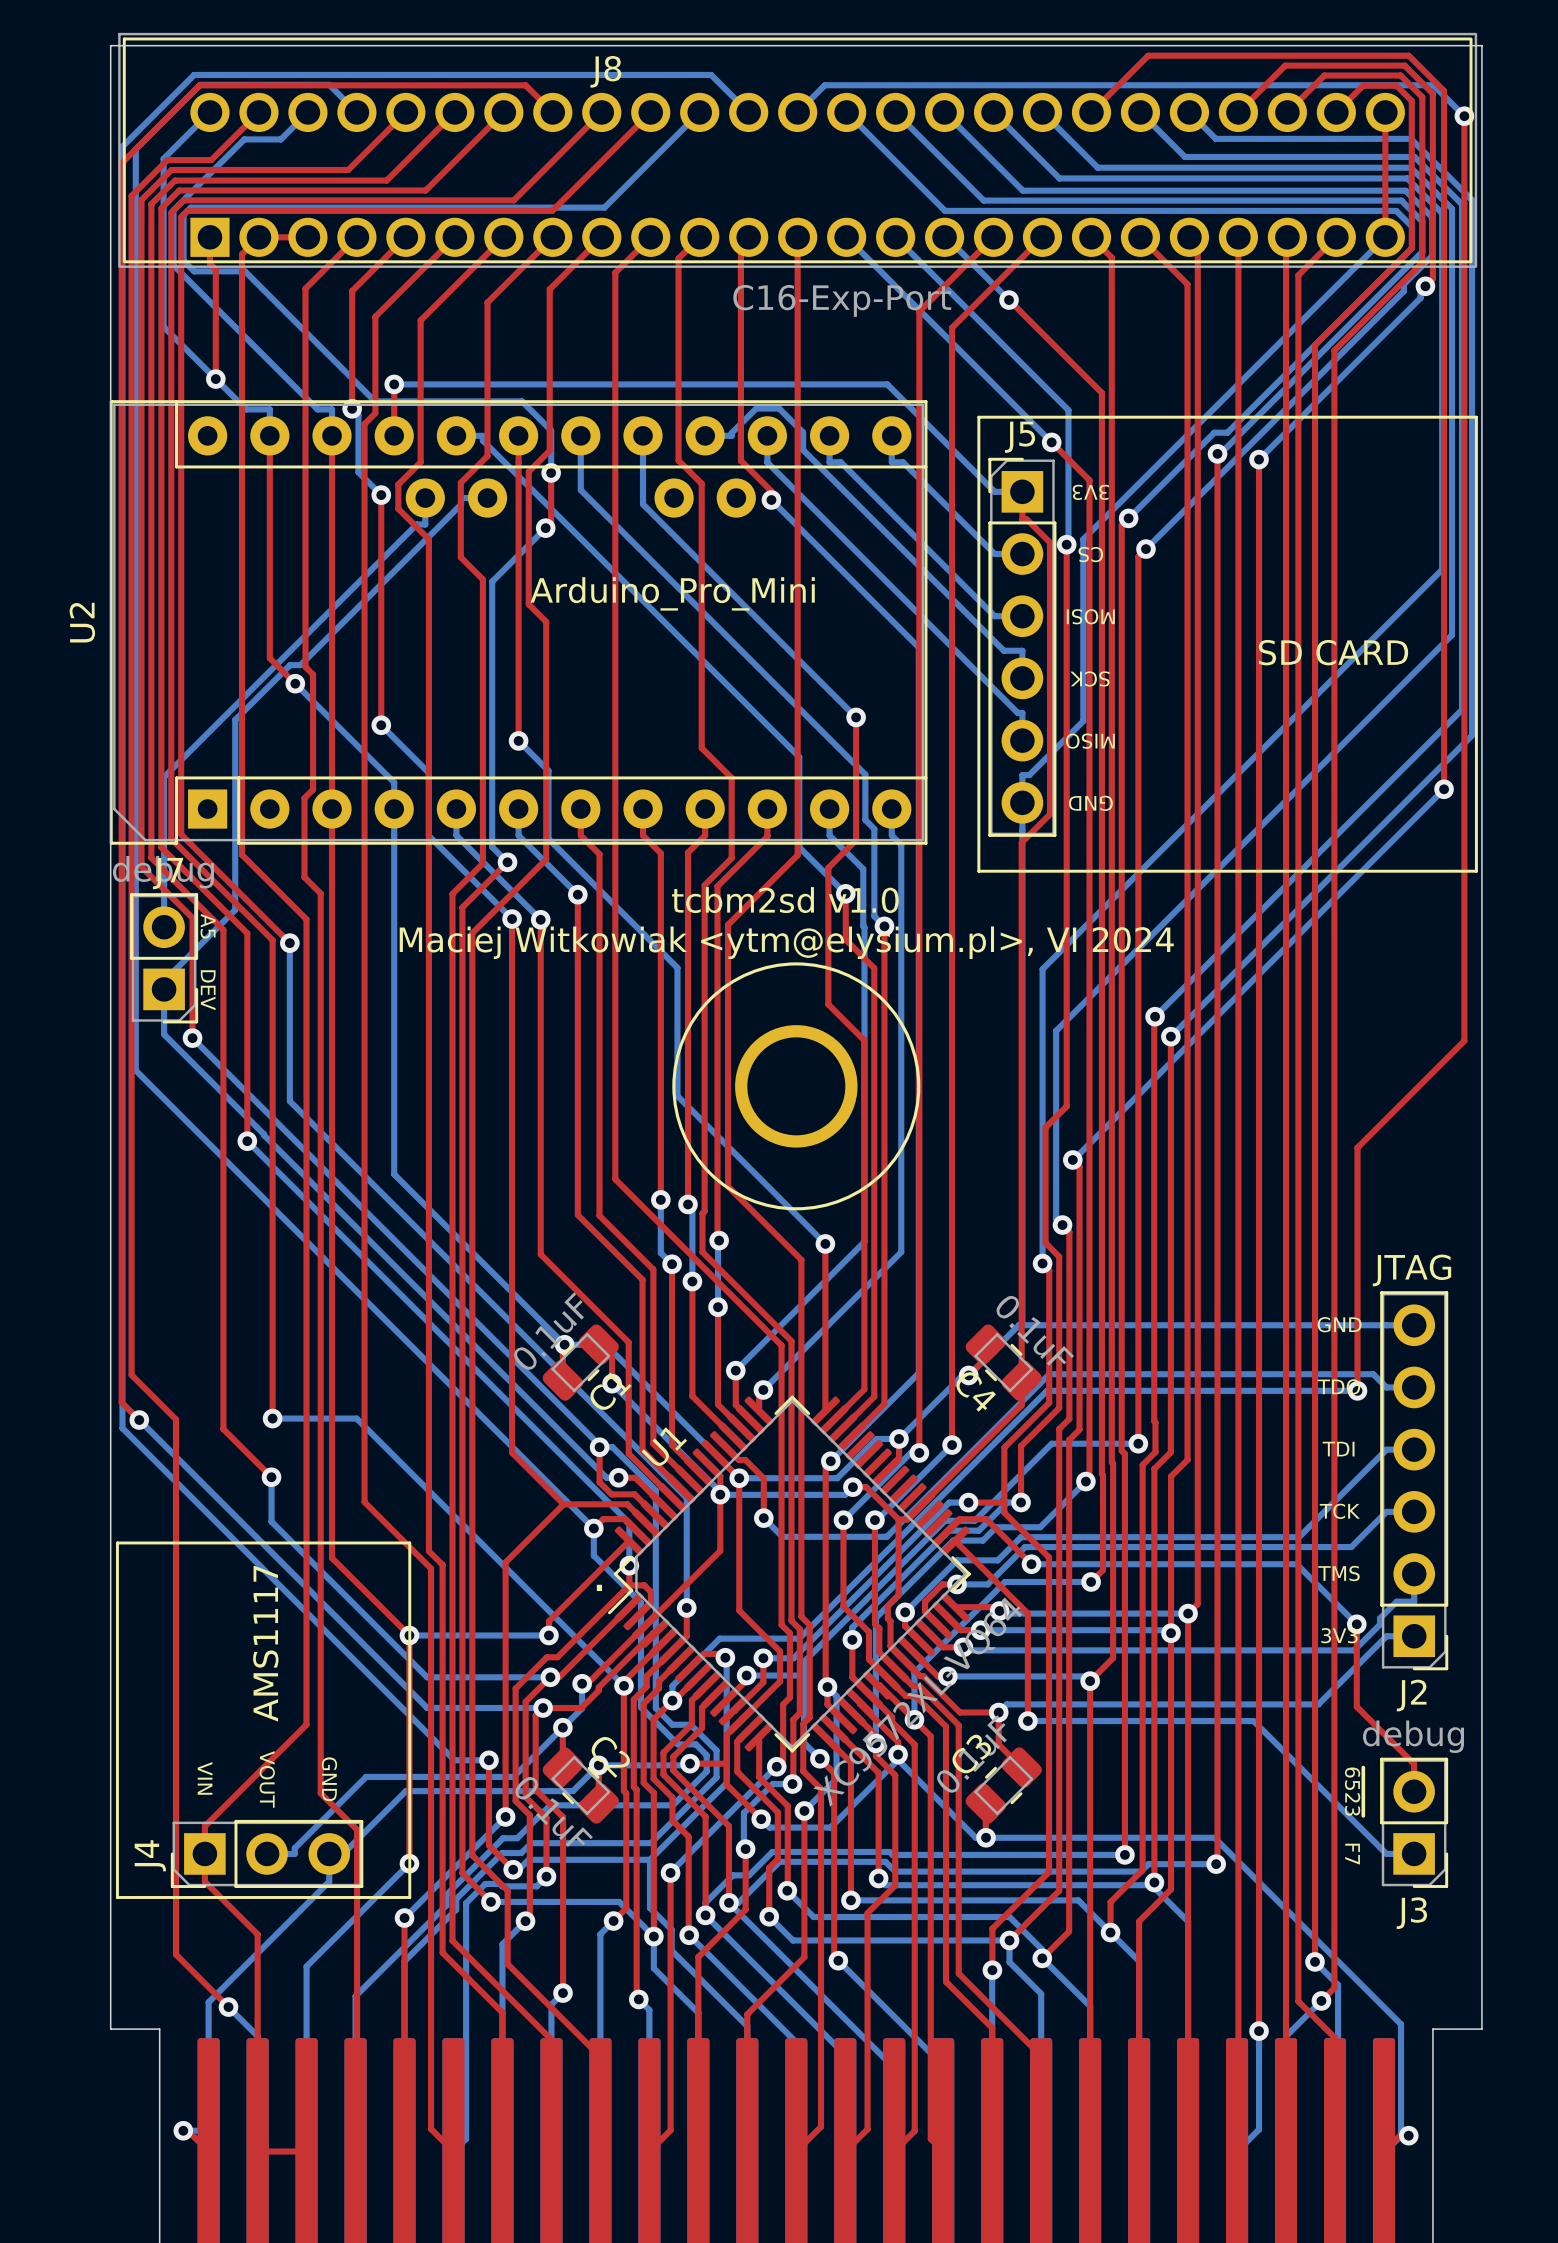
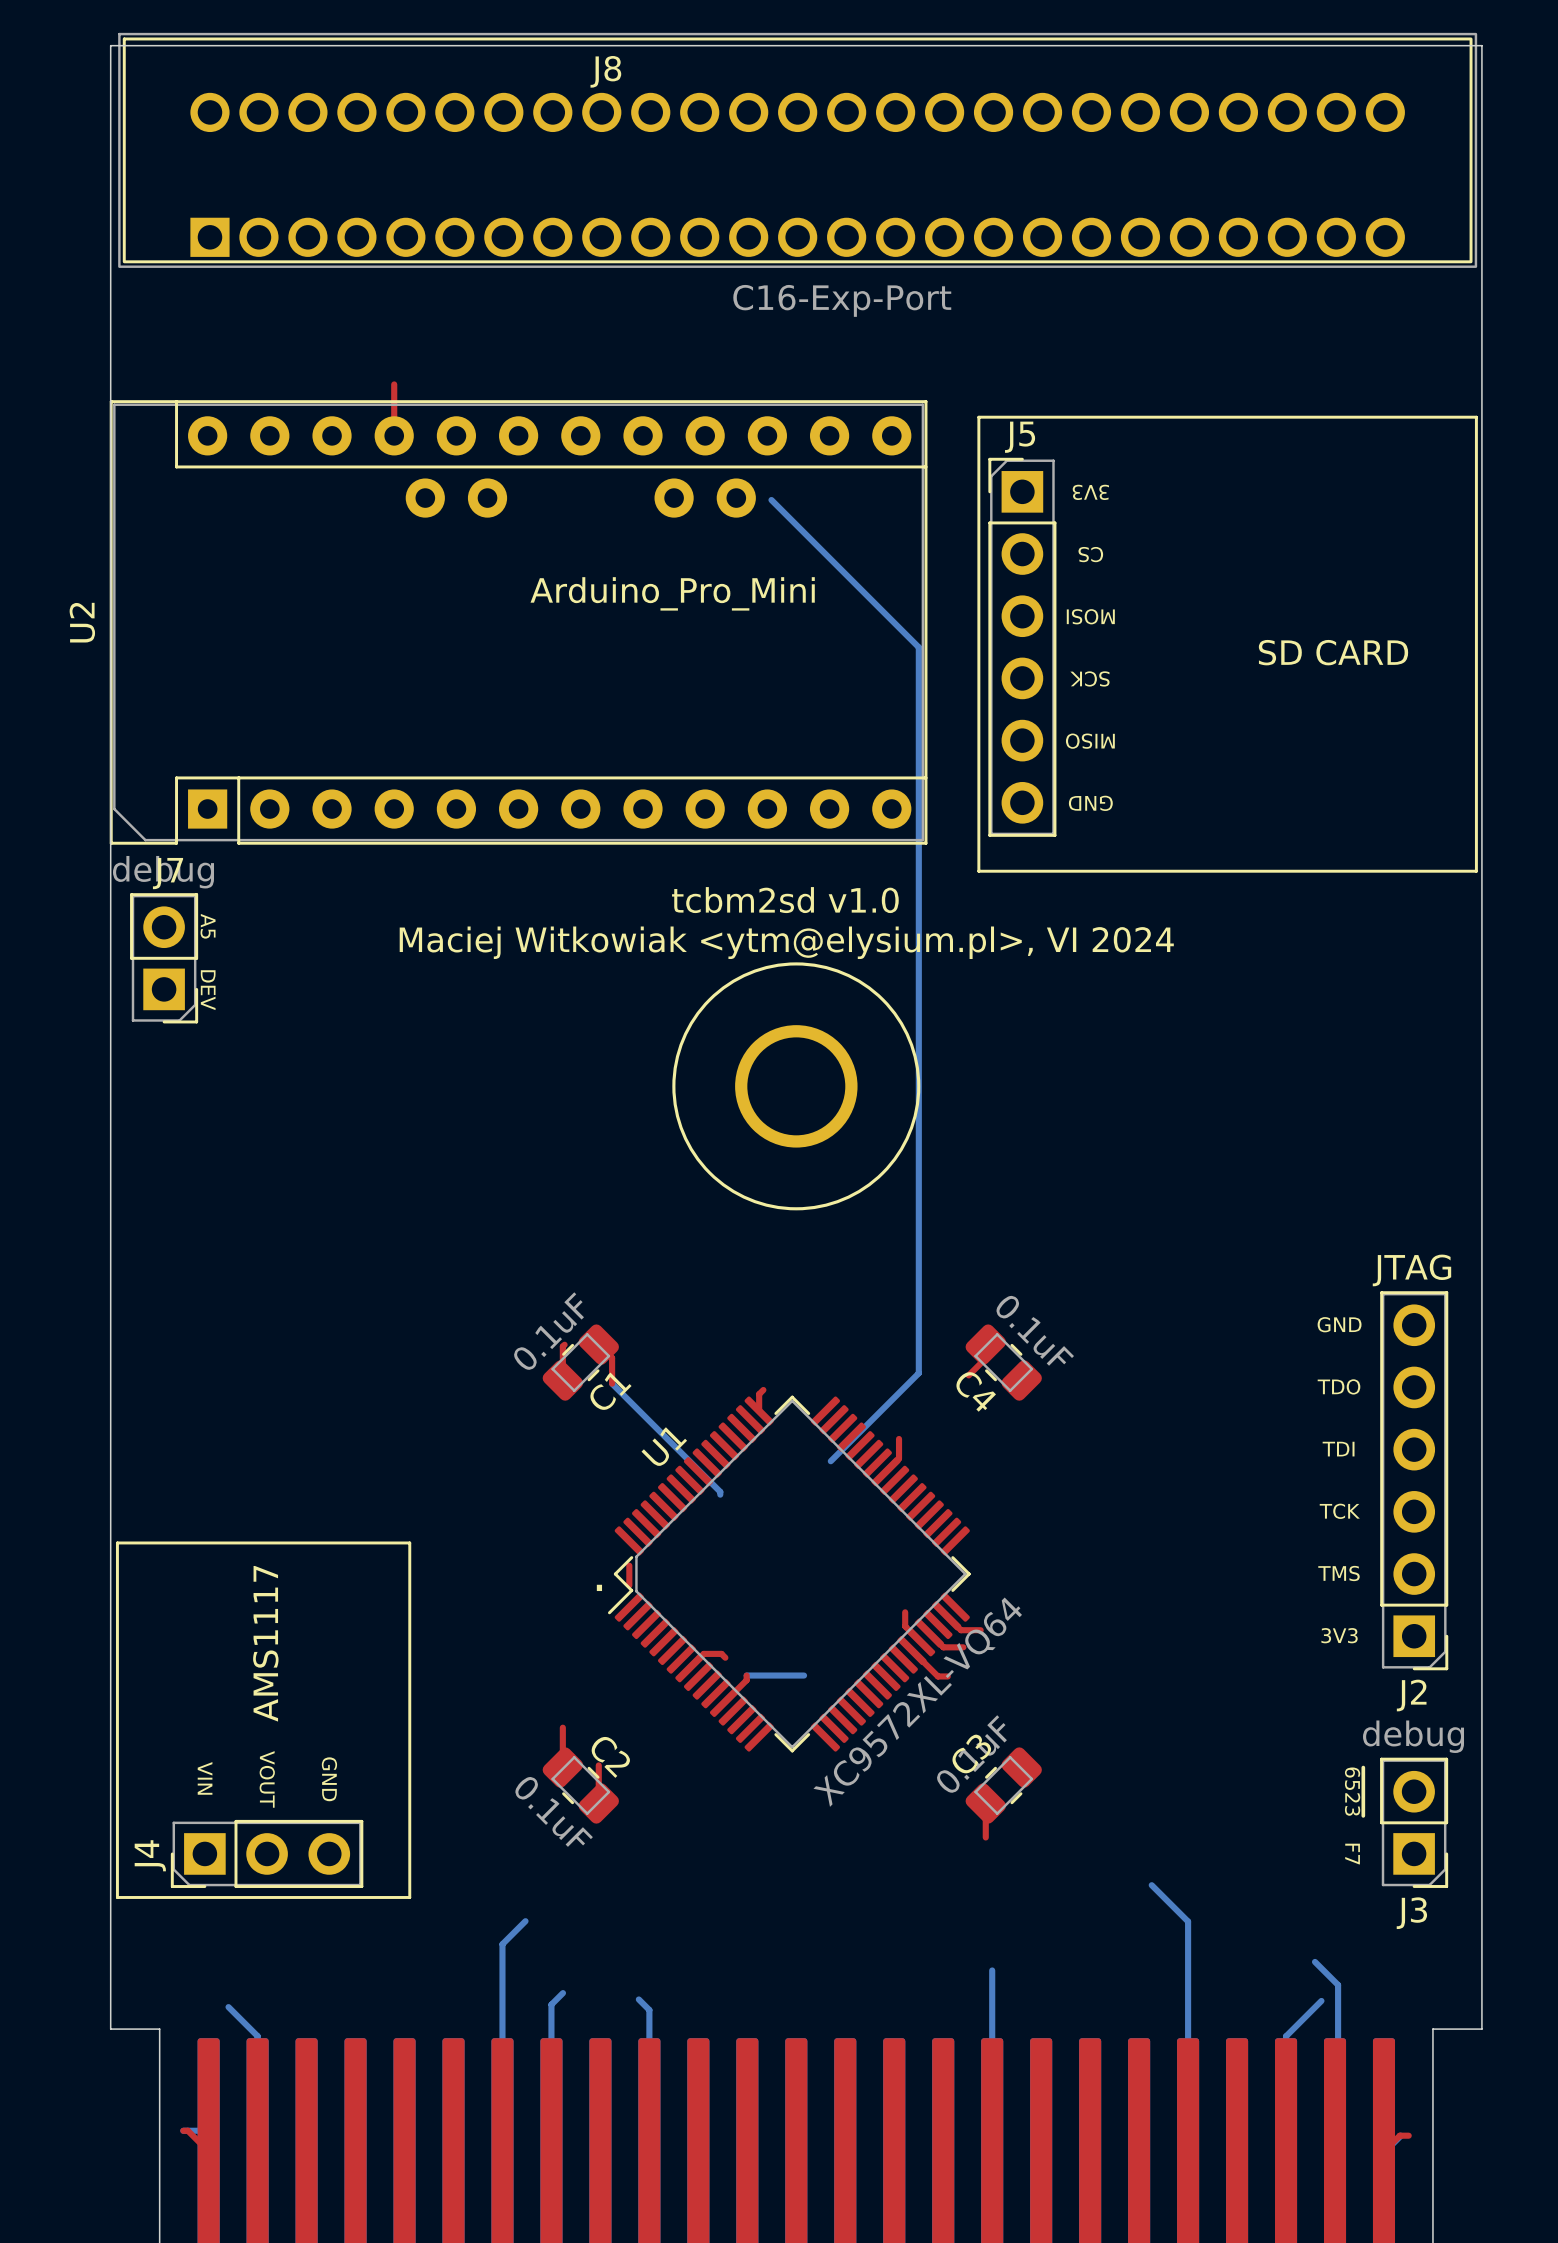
bottom track: (209, 112) (163, 158) (163, 326) (246, 409) (269, 409) (269, 435) -> none
top track: (258, 112) (211, 160) (167, 160) (131, 195) (131, 1375) (176, 1419) (176, 1954) (228, 2007) -> none
bottom track: (307, 112) (280, 139) (244, 139) (173, 210) (173, 265) (317, 409) (332, 409) (332, 435) -> none
bottom track: (356, 112) (329, 84) (200, 84) (135, 149) (135, 1070) (593, 1528) (593, 1555) (641, 1602) (641, 1707) (677, 1744) (695, 1744) (706, 1755) (706, 1771) (672, 1805) (550, 1805) (517, 1838) (503, 1838) (446, 1894) (446, 1905) (355, 1996) (355, 2151) -> none
top track: (405, 112) (348, 169) (171, 169) (141, 200) (141, 866) (192, 917) (192, 1038) -> none
top track: (454, 112) (386, 180) (174, 180) (151, 204) (151, 857) (223, 929) (223, 1429) (271, 1477) -> none
top track: (503, 112) (425, 190) (179, 190) (161, 208) (161, 847) (247, 933) (247, 1141) -> none
top track: (552, 112) (525, 85) (199, 85) (121, 163) (121, 1402) (139, 1420) -> none
top track: (601, 112) (513, 200) (183, 200) (171, 212) (171, 838) (272, 940) (272, 1418) -> none
top track: (650, 112) (552, 210) (187, 210) (181, 217) (181, 834) (289, 943) -> none
bottom track: (699, 112) (604, 207) (190, 207) (183, 214) (183, 260) (194, 271) (244, 271) (374, 401) (522, 401) (551, 430) (551, 472) -> none
bottom track: (748, 112) (711, 74) (194, 74) (122, 146) (122, 1428) (454, 1760) (488, 1760) -> none
bottom track: (797, 112) (824, 85) (1433, 85) (1464, 116) -> none
bottom track: (846, 112) (945, 210) (1396, 210) (1412, 226) (1412, 248) (1227, 432) (1214, 432) (1128, 518) -> none
bottom track: (895, 112) (983, 200) (1401, 200) (1422, 221) (1422, 251) (1220, 453) (1217, 453) -> none
bottom track: (944, 112) (1022, 190) (1405, 190) (1432, 217) (1432, 255) (1403, 284) (1403, 291) (1145, 549) -> none
bottom track: (993, 112) (1059, 178) (1407, 178) (1442, 213) (1442, 569) (1042, 969) (1042, 1263) -> none
bottom track: (1042, 112) (1097, 167) (1410, 167) (1452, 208) (1452, 635) (1056, 1030) (1056, 1218) (1062, 1225) -> none
top track: (1091, 112) (1148, 55) (1408, 55) (1444, 90) (1444, 789) -> none
bottom track: (1140, 112) (1185, 156) (1414, 156) (1462, 204) (1462, 709) (1155, 1016) -> none
bottom track: (1189, 112) (1215, 138) (1410, 138) (1472, 199) (1472, 735) (1170, 1036) -> none
top track: (1238, 112) (1285, 65) (1404, 65) (1432, 93) (1432, 278) (1425, 286) -> none
top track: (1287, 112) (1324, 75) (1400, 75) (1422, 97) (1422, 262) (1334, 350) (1334, 1987) (1321, 2000) -> none
top track: (1336, 112) (1363, 85) (1396, 85) (1411, 100) (1411, 248) (1315, 345) (1315, 1961) -> none
top track: (1385, 112) (1385, 237) -> none
top track: (1464, 116) (1464, 1040) (1357, 1147) (1357, 1390) -> none
via: (1464, 116) -> none
top track: (209, 237) (209, 263) (215, 269) (215, 379) -> none
top track: (307, 237) (258, 237) (242, 254) (242, 854) (306, 919) (306, 1724) (204, 1826) (204, 1881) (257, 1934) (257, 2151) (306, 2151) -> none
top track: (356, 237) (305, 288) (305, 666) (313, 674) (313, 789) (304, 798) (304, 877) (320, 893) (320, 1793) (357, 1829) (357, 2149) (355, 2151) -> none
top track: (405, 237) (352, 291) (352, 408) -> none
top track: (454, 237) (375, 316) (375, 413) (364, 424) (364, 1502) (431, 1568) (431, 2129) (453, 2151) -> none
top track: (503, 237) (420, 320) (420, 462) (398, 484) (398, 508) (428, 539) (428, 1551) (442, 1564) (442, 1952) (502, 2012) (502, 2151) -> none
top track: (552, 237) (487, 302) (487, 456) (460, 482) (460, 557) (482, 579) (482, 863) (452, 893) (452, 1940) (551, 2039) (551, 2151) -> none
top track: (601, 237) (549, 289) (549, 450) (528, 471) (528, 604) (546, 621) (546, 859) (472, 933) (472, 1855) (507, 1890) (507, 1964) (600, 2056) (600, 2151) -> none
top track: (650, 237) (615, 272) (615, 1179) (781, 1345) (781, 1624) (789, 1633) (789, 1697) (783, 1704) (783, 1760) (776, 1766) -> none
top track: (699, 237) (678, 258) (678, 460) (701, 483) (701, 748) (731, 778) (731, 858) (704, 885) (704, 1211) (702, 1213) (702, 1252) (791, 1341) (791, 1620) (799, 1629) (799, 1713) (793, 1719) (792, 1784) -> none
top track: (748, 237) (740, 245) (740, 460) (771, 491) (771, 500) -> none
top track: (797, 237) (797, 855) (728, 924) (728, 1186) (801, 1259) (801, 1616) (809, 1625) (809, 1717) (803, 1723) (803, 1771) (821, 1789) (821, 2126) (796, 2151) -> none
bottom track: (846, 237) (1051, 442) -> none
bottom track: (895, 237) (1068, 410) (1068, 542) (1066, 544) -> none
bottom track: (944, 237) (1009, 300) -> none
top track: (993, 237) (919, 311) (919, 1452) -> none
top track: (1042, 237) (952, 327) (952, 1445) -> none
top track: (1091, 237) (1111, 257) (1113, 1658) (1090, 1681) (1090, 2151) -> none
top track: (1140, 237) (1187, 284) (1187, 1459) (1171, 1476) (1171, 1889) (1139, 1921) (1139, 2151) -> none
top track: (1189, 237) (1197, 245) (1197, 1603) (1188, 1613) (1188, 2151) -> none
top track: (1238, 237) (1237, 2151) -> none
top track: (1287, 237) (1286, 2151) -> none
top track: (1336, 237) (1298, 275) (1298, 2001) (1335, 2038) (1335, 2151) -> none
bottom track: (1385, 237) (1083, 539) (1083, 721) (1029, 775) (1022, 775) (1022, 1325) -> none
bottom track: (1425, 286) (1420, 291) (1420, 298) (1259, 459) -> none
via: (1425, 286) -> none
top track: (1009, 300) (1101, 392) (1103, 1570) (1091, 1582) -> none
via: (1009, 300) -> none
via: (215, 379) -> none
bottom track: (394, 384) (887, 384) (994, 491) (1022, 491) -> none
via: (394, 384) -> none
bottom track: (352, 408) (358, 415) (358, 472) (381, 495) -> none
via: (352, 408) -> none
top track: (269, 435) (269, 658) (295, 683) -> none
top track: (332, 435) (332, 1558) (409, 1635) (409, 1863) -> none
bottom track: (456, 435) (482, 435) (482, 440) (799, 757) (799, 847) (845, 893) -> none
top track: (518, 435) (518, 740) -> none
bottom track: (580, 435) (580, 490) (865, 774) (865, 819) (874, 828) (874, 916) (884, 926) -> none
bottom track: (643, 435) (643, 504) (856, 717) -> none
bottom track: (705, 435) (731, 435) (731, 433) (756, 408) (779, 408) (803, 432) (803, 449) (1003, 650) (1022, 650) (1022, 678) -> none
bottom track: (767, 435) (767, 462) (1017, 712) (1022, 712) (1022, 740) -> none
bottom track: (829, 435) (829, 462) (840, 462) (994, 616) (1022, 616) -> none
bottom track: (891, 435) (891, 462) (903, 462) (994, 554) (1022, 554) -> none
top track: (1051, 442) (1089, 480) (1089, 1477) (1085, 1481) -> none
via: (1051, 442) -> none
top track: (1217, 453) (1216, 1864) -> none
via: (1217, 453) -> none
top track: (1259, 459) (1259, 2031) -> none
via: (1259, 459) -> none
top track: (551, 472) (551, 522) (545, 528) -> none
via: (551, 472) -> none
top track: (1022, 491) (1022, 519) (1026, 519) (1050, 542) (1050, 814) (1021, 842) (1021, 1405) (907, 1519) (898, 1519) -> none
top track: (381, 495) (381, 725) -> none
via: (381, 495) -> none
bottom track: (425, 498) (425, 524) (416, 524) (164, 777) (164, 939) -> none
bottom track: (487, 498) (461, 498) (461, 504) (300, 665) (290, 665) (235, 719) (235, 909) (171, 974) (164, 974) (164, 1034) (606, 1477) (618, 1477) -> none
via: (771, 500) -> none
top track: (1128, 518) (1121, 525) (1121, 1450) (1124, 1453) (1124, 1854) -> none
via: (1128, 518) -> none
bottom track: (545, 528) (492, 581) (492, 846) (507, 862) -> none
via: (545, 528) -> none
top track: (1066, 544) (1066, 1106) (1045, 1127) (1045, 1243) (1059, 1256) (1059, 1407) (1021, 1446) (1021, 1502) -> none
via: (1066, 544) -> none
top track: (1145, 549) (1138, 556) (1138, 1443) -> none
via: (1145, 549) -> none
bottom track: (295, 683) (394, 782) (394, 1174) (564, 1344) (605, 1344) (739, 1478) (837, 1478) (876, 1438) (899, 1438) (962, 1375) (968, 1375) (1018, 1325) (1414, 1325) -> none
via: (295, 683) -> none
top track: (856, 717) (856, 840) (828, 867) (828, 1004) (864, 1040) (864, 1389) (834, 1419) -> none
via: (856, 717) -> none
bottom track: (381, 725) (428, 772) (428, 835) (512, 919) -> none
via: (381, 725) -> none
bottom track: (518, 740) (548, 770) (548, 838) (677, 967) (677, 1096) (825, 1243) -> none
via: (518, 740) -> none
bottom track: (1444, 789) (1072, 1159) -> none
via: (1444, 789) -> none
bottom track: (456, 809) (456, 835) (540, 919) -> none
bottom track: (518, 809) (518, 835) (577, 894) -> none
top track: (580, 809) (580, 835) (599, 854) (599, 1215) (653, 1269) (653, 1443) (689, 1480) -> none
top track: (643, 809) (643, 835) (660, 853) (660, 1199) -> none
top track: (705, 809) (705, 835) (688, 852) (688, 1204) -> none
top track: (767, 809) (767, 836) (717, 886) (717, 1238) (719, 1240) -> none
bottom track: (829, 809) (829, 835) (863, 869) (864, 1241) (735, 1370) -> none
bottom track: (891, 809) (891, 835) (901, 844) (901, 1252) (763, 1389) -> none
top track: (507, 862) (462, 907) (462, 1873) (490, 1901) -> none
via: (507, 862) -> none
top track: (845, 893) (845, 939) (874, 968) (874, 1396) (842, 1428) -> none
via: (845, 893) -> none
top track: (577, 894) (577, 1215) (642, 1279) (642, 1450) (681, 1488) -> none
via: (577, 894) -> none
top track: (512, 919) (512, 1452) (563, 1504) -> none
via: (512, 919) -> none
top track: (540, 919) (540, 1254) (628, 1342) (628, 1453) (672, 1497) -> none
via: (540, 919) -> none
top track: (884, 926) (884, 1403) (851, 1437) -> none
via: (884, 926) -> none
bottom track: (289, 943) (289, 1101) (686, 1498) (686, 1607) -> none
via: (289, 943) -> none
top track: (1155, 1016) (1155, 1452) (1142, 1464) (1142, 1870) (1110, 1902) (1110, 1932) -> none
via: (1155, 1016) -> none
top track: (1170, 1036) (1170, 1452) (1154, 1468) (1154, 1882) -> none
via: (1170, 1036) -> none
bottom track: (192, 1038) (599, 1447) (612, 1447) (655, 1490) (655, 1708) (672, 1724) (690, 1724) (716, 1750) (716, 1777) (650, 1843) (531, 1843) (521, 1853) (502, 1853) (456, 1899) (456, 1909) (404, 1961) (404, 2151) -> none
via: (192, 1038) -> none
bottom track: (247, 1141) (629, 1523) (629, 1565) -> none
via: (247, 1141) -> none
top track: (1072, 1159) (1079, 1166) (1079, 1429) (1069, 1440) (1069, 1931) (1042, 1958) -> none
via: (1072, 1159) -> none
bottom track: (660, 1199) (660, 1252) (672, 1264) -> none
via: (660, 1199) -> none
bottom track: (688, 1204) (692, 1208) (692, 1281) -> none
via: (688, 1204) -> none
top track: (1062, 1225) (1069, 1231) (1069, 1418) (1059, 1429) (1059, 1890) (1009, 1940) -> none
via: (1062, 1225) -> none
bottom track: (719, 1240) (718, 1307) -> none
via: (719, 1240) -> none
top track: (825, 1243) (825, 1411) -> none
via: (825, 1243) -> none
top track: (1042, 1263) (1049, 1270) (1049, 1402) (1004, 1447) (1004, 1512) (1049, 1557) (1049, 1872) (992, 1928) (992, 1970) -> none
via: (1042, 1263) -> none
top track: (672, 1264) (672, 1445) (698, 1471) -> none
via: (672, 1264) -> none
top track: (692, 1281) (692, 1396) (733, 1437) -> none
via: (692, 1281) -> none
top track: (718, 1307) (718, 1404) (741, 1428) -> none
via: (718, 1307) -> none
via: (564, 1344) -> none
top track: (735, 1370) (735, 1404) (750, 1419) -> none
via: (735, 1370) -> none
via: (968, 1375) -> none
via: (612, 1383) -> none
bottom track: (1414, 1387) (1386, 1387) (1373, 1374) (1049, 1374) (886, 1536) (782, 1536) (763, 1518) -> none
via: (763, 1389) -> none
bottom track: (1357, 1390) (1046, 1390) (799, 1638) (719, 1638) (672, 1685) (672, 1700) -> none
via: (1357, 1390) -> none
bottom track: (272, 1418) (356, 1418) (624, 1685) -> none
via: (272, 1418) -> none
bottom track: (139, 1420) (427, 1708) (543, 1708) -> none
via: (139, 1420) -> none
via: (899, 1438) -> none
bottom track: (1138, 1443) (1051, 1443) (974, 1520) (945, 1520) (804, 1661) (804, 1742) (819, 1758) -> none
via: (1138, 1443) -> none
top track: (724, 1445) (738, 1460) (745, 1460) (763, 1478) (763, 1518) -> none
bottom track: (952, 1445) (874, 1520) -> none
via: (952, 1445) -> none
top track: (599, 1447) (599, 1482) (611, 1494) (634, 1494) (655, 1514) -> none
via: (599, 1447) -> none
bottom track: (1414, 1449) (1386, 1449) (1299, 1537) (1021, 1537) (997, 1560) (957, 1560) (905, 1612) -> none
bottom track: (919, 1452) (910, 1452) (843, 1520) -> none
via: (919, 1452) -> none
top track: (715, 1454) (739, 1478) (739, 1610) (780, 1651) (780, 1681) (726, 1734) (726, 1784) (761, 1819) -> none
top track: (830, 1461) (825, 1466) (825, 1685) (827, 1687) (827, 1704) (842, 1719) -> none
via: (830, 1461) -> none
top track: (707, 1463) (720, 1476) (720, 1550) (587, 1683) (582, 1683) -> none
bottom track: (271, 1477) (271, 1521) (427, 1677) (550, 1677) -> none
via: (271, 1477) -> none
top track: (618, 1477) (635, 1477) (663, 1506) -> none
via: (618, 1477) -> none
via: (739, 1478) -> none
bottom track: (1085, 1481) (1040, 1527) (996, 1527) (982, 1540) (953, 1540) (875, 1617) (875, 1743) -> none
via: (1085, 1481) -> none
top track: (852, 1487) (866, 1487) (898, 1519) -> none
bottom track: (852, 1487) (845, 1494) (720, 1494) -> none
via: (852, 1487) -> none
via: (720, 1494) -> none
top track: (968, 1502) (1004, 1502) -> none
bottom track: (968, 1502) (949, 1502) (793, 1658) (763, 1658) -> none
via: (968, 1502) -> none
bottom track: (1021, 1502) (1006, 1502) (978, 1530) (949, 1530) (852, 1627) (852, 1639) -> none
via: (1021, 1502) -> none
top track: (563, 1504) (505, 1562) (505, 1816) -> none
top track: (563, 1504) (627, 1504) (646, 1523) -> none
bottom track: (1414, 1511) (1386, 1511) (1351, 1547) (1025, 1547) (987, 1584) (957, 1584) -> none
via: (763, 1518) -> none
top track: (898, 1519) (898, 1595) (887, 1605) (887, 1618) (890, 1621) (890, 1646) (959, 1712) (998, 1712) (998, 1744) (1021, 1767) -> none
top track: (843, 1520) (843, 1606) (869, 1632) (869, 1659) (905, 1695) (915, 1695) (946, 1726) (946, 1981) (992, 2027) (992, 2151) -> none
via: (843, 1520) -> none
top track: (874, 1520) (874, 1623) (879, 1628) (879, 1652) (912, 1685) (919, 1685) (958, 1725) (958, 1973) (1041, 2055) (1041, 2151) -> none
via: (874, 1520) -> none
top track: (593, 1528) (603, 1519) (624, 1519) (637, 1532) -> none
via: (593, 1528) -> none
top track: (946, 1532) (959, 1519) (986, 1519) (1031, 1564) -> none
top track: (629, 1540) (548, 1621) (548, 1635) -> none
top track: (955, 1540) (1027, 1613) (1027, 1721) -> none
bottom track: (1031, 1564) (1296, 1564) (1356, 1624) -> none
via: (1031, 1564) -> none
via: (629, 1565) -> none
bottom track: (1414, 1574) (1414, 1601) (1396, 1601) (1380, 1618) (1380, 1624) (1354, 1650) (966, 1650) (963, 1647) -> none
bottom track: (1091, 1582) (1005, 1582) (914, 1672) (914, 1719) -> none
via: (1091, 1582) -> none
top track: (957, 1584) (942, 1584) (925, 1601) (925, 1611) (937, 1624) -> none
via: (957, 1584) -> none
top track: (629, 1607) (559, 1677) (550, 1677) (525, 1701) (525, 1796) (546, 1817) (546, 1876) -> none
top track: (686, 1607) (686, 1636) (646, 1676) (646, 1686) (633, 1699) (633, 1786) (636, 1789) (636, 1997) (638, 1999) -> none
via: (686, 1607) -> none
top track: (955, 1607) (995, 1607) (999, 1610) -> none
bottom track: (999, 1610) (1002, 1613) (1188, 1613) -> none
via: (999, 1610) -> none
via: (905, 1612) -> none
via: (1188, 1613) -> none
top track: (637, 1615) (650, 1602) (650, 1591) (644, 1585) (629, 1585) (557, 1657) (546, 1657) (515, 1688) (515, 1800) (529, 1815) (529, 1916) (525, 1921) -> none
top track: (1356, 1624) (1356, 1706) (1414, 1764) (1414, 1791) -> none
via: (1356, 1624) -> none
bottom track: (980, 1630) (1168, 1630) (1171, 1633) -> none
via: (980, 1630) -> none
top track: (655, 1633) (598, 1687) (598, 1690) (581, 1708) (543, 1708) (535, 1715) (535, 1789) (563, 1817) (563, 1992) -> none
via: (1171, 1633) -> none
bottom track: (409, 1635) (548, 1635) -> none
via: (409, 1635) -> none
via: (548, 1635) -> none
bottom track: (1414, 1636) (1386, 1636) (1318, 1704) (1006, 1704) (998, 1712) -> none
top track: (852, 1639) (852, 1677) (891, 1716) (891, 1721) (914, 1744) (914, 2131) (894, 2151) -> none
via: (852, 1639) -> none
top track: (663, 1641) (624, 1681) (626, 1908) (613, 1921) -> none
via: (963, 1647) -> none
bottom track: (725, 1657) (726, 1783) (649, 1859) -> none
via: (725, 1657) -> none
top track: (763, 1658) (763, 1682) (733, 1711) -> none
via: (763, 1658) -> none
top track: (681, 1659) (659, 1681) (659, 1688) (643, 1703) (643, 1782) (653, 1793) (653, 1936) -> none
via: (746, 1675) -> none
top track: (698, 1676) (653, 1719) (653, 1778) (672, 1797) (672, 1820) (688, 1836) (689, 1935) -> none
bottom track: (947, 1676) (1085, 1676) (1090, 1681) -> none
via: (947, 1676) -> none
via: (550, 1677) -> none
via: (1090, 1681) -> none
bottom track: (582, 1683) (582, 1708) (513, 1776) (366, 1776) (294, 1848) (294, 1853) (267, 1853) -> none
via: (582, 1683) -> none
via: (624, 1685) -> none
top track: (707, 1685) (691, 1700) (691, 1724) (663, 1752) (663, 1774) (705, 1816) (705, 1915) -> none
top track: (877, 1685) (879, 1685) (930, 1736) (930, 2139) (943, 2151) -> none
bottom track: (827, 1687) (836, 1696) (836, 1778) (804, 1810) -> none
via: (827, 1687) -> none
top track: (715, 1693) (702, 1707) (702, 1728) (673, 1756) (673, 1770) (728, 1826) (728, 1902) -> none
via: (672, 1700) -> none
top track: (860, 1702) (898, 1742) (898, 1754) -> none
via: (543, 1708) -> none
top track: (851, 1711) (875, 1735) (875, 1755) (895, 1775) (895, 1885) (867, 1913) (867, 2129) (845, 2151) -> none
via: (998, 1712) -> none
via: (914, 1719) -> none
bottom track: (1027, 1721) (1253, 1721) (1386, 1853) (1414, 1853) -> none
via: (1027, 1721) -> none
via: (562, 1727) -> none
top track: (750, 1728) (737, 1741) (737, 1771) (777, 1812) (777, 1859) (769, 1867) (769, 1916) -> none
top track: (834, 1728) (878, 1772) (878, 1878) -> none
top track: (759, 1737) (759, 1777) (787, 1806) (787, 1890) -> none
top track: (825, 1737) (850, 1762) (850, 1900) -> none
via: (875, 1743) -> none
via: (898, 1754) -> none
top track: (819, 1758) (834, 1773) (834, 1956) (838, 1960) -> none
via: (819, 1758) -> none
bottom track: (898, 1759) (830, 1827) (769, 1827) (761, 1819) -> none
bottom track: (898, 1759) (975, 1837) (1214, 1837) (1401, 2024) (1401, 2135) (1408, 2135) -> none
top track: (488, 1760) (488, 1845) (513, 1869) -> none
via: (488, 1760) -> none
top track: (690, 1763) (726, 1763) -> none
bottom track: (690, 1763) (688, 1765) (598, 1765) (573, 1791) (405, 1791) (329, 1867) -> none
via: (690, 1763) -> none
via: (598, 1765) -> none
bottom track: (776, 1766) (670, 1872) -> none
via: (776, 1766) -> none
bottom track: (792, 1784) (772, 1784) (743, 1813) (743, 1847) (745, 1849) -> none
via: (792, 1784) -> none
top track: (804, 1810) (804, 1957) (747, 2014) (747, 2151) -> none
via: (804, 1810) -> none
bottom track: (505, 1816) (404, 1918) -> none
via: (505, 1816) -> none
via: (761, 1819) -> none
via: (986, 1837) -> none
top track: (745, 1849) (745, 1909) (698, 1956) (698, 2151) -> none
via: (745, 1849) -> none
bottom track: (329, 1853) (329, 1881) (208, 2002) (208, 2151) -> none
bottom track: (1124, 1854) (892, 1854) (889, 1851) (772, 1851) (749, 1875) (732, 1875) (705, 1902) (705, 1915) (845, 2055) (845, 2151) -> none
via: (1124, 1854) -> none
bottom track: (649, 1859) (649, 1907) (671, 1929) (671, 1950) (747, 2026) (747, 2151) -> none
bottom track: (649, 1859) (528, 1859) (518, 1869) (513, 1869) -> none
bottom track: (409, 1863) (306, 1966) (306, 2151) -> none
via: (409, 1863) -> none
bottom track: (1216, 1864) (1148, 1864) (1140, 1871) (895, 1871) (885, 1861) (779, 1861) (738, 1902) (728, 1902) (894, 2068) (894, 2151) -> none
via: (1216, 1864) -> none
via: (513, 1869) -> none
top track: (670, 1872) (670, 2130) (649, 2151) -> none
via: (670, 1872) -> none
bottom track: (546, 1876) (536, 1886) (502, 1886) (499, 1883) (485, 1883) (466, 1903) (466, 2138) (453, 2151) -> none
via: (546, 1876) -> none
bottom track: (878, 1878) (885, 1885) (1151, 1885) (1154, 1882) -> none
via: (878, 1878) -> none
via: (1154, 1882) -> none
bottom track: (787, 1890) (813, 1917) (1009, 1917) (1042, 1949) (1042, 1958) (1090, 2006) (1090, 2151) -> none
via: (787, 1890) -> none
bottom track: (850, 1900) (1078, 1900) (1139, 1961) (1139, 2151) -> none
via: (850, 1900) -> none
bottom track: (490, 1901) (619, 1901) (653, 1936) (653, 1968) (698, 2012) (698, 2151) -> none
via: (490, 1901) -> none
via: (728, 1902) -> none
via: (705, 1915) -> none
bottom track: (769, 1916) (792, 1940) (1009, 1940) (1009, 1962) (1041, 1993) (1041, 2151) -> none
via: (769, 1916) -> none
top track: (404, 1918) (404, 2151) -> none
via: (404, 1918) -> none
via: (525, 1921) -> none
bottom track: (613, 1921) (600, 1934) (600, 2151) -> none
via: (613, 1921) -> none
via: (1110, 1932) -> none
bottom track: (689, 1935) (796, 2042) (796, 2151) -> none
via: (689, 1935) -> none
via: (653, 1936) -> none
via: (1009, 1940) -> none
via: (1042, 1958) -> none
bottom track: (838, 1960) (943, 2065) (943, 2151) -> none
via: (838, 1960) -> none
via: (1315, 1961) -> none
via: (992, 1970) -> none
via: (562, 1993) -> none
via: (638, 1999) -> none
via: (1321, 2000) -> none
via: (228, 2007) -> none
bottom track: (1259, 2031) (1259, 2129) (1237, 2151) -> none
via: (1259, 2031) -> none
via: (183, 2130) -> none
via: (1408, 2135) -> none

